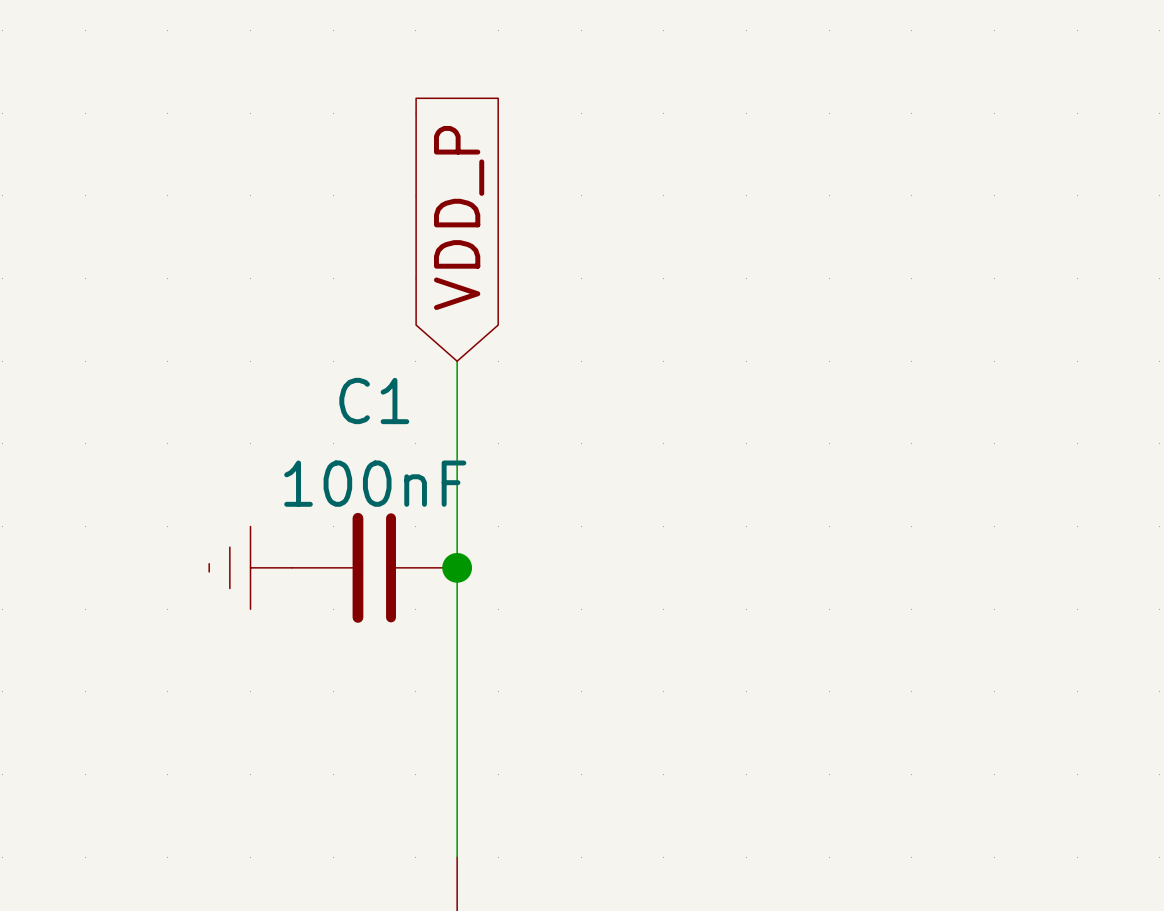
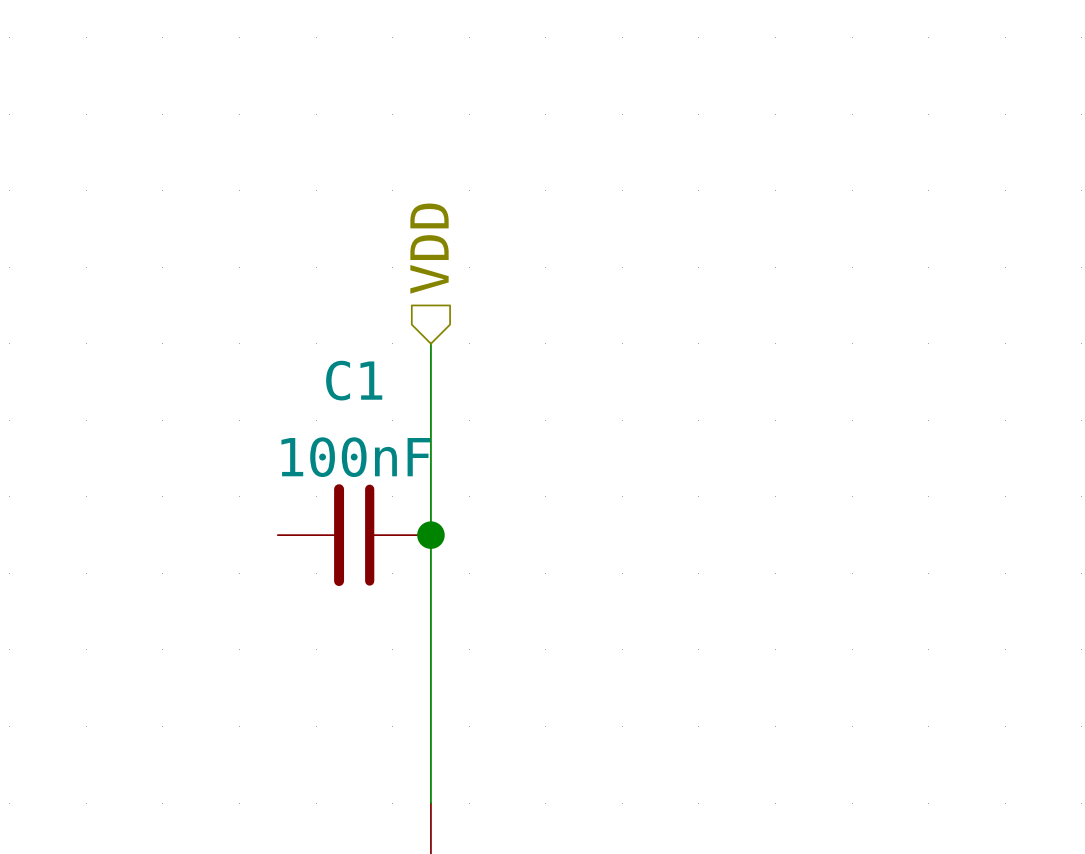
global label: VDD_P (459, 217) -> none
hierarchical label: none -> VDD (429, 248)
power symbol: (250, 567) -> none

